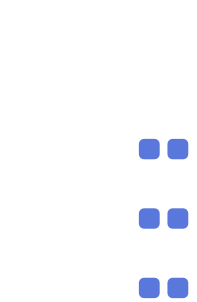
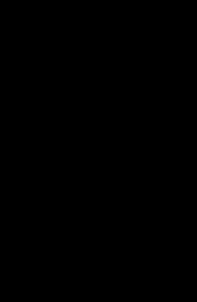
part: (163, 149) -> none
part: (163, 218) -> none
part: (163, 287) -> none

